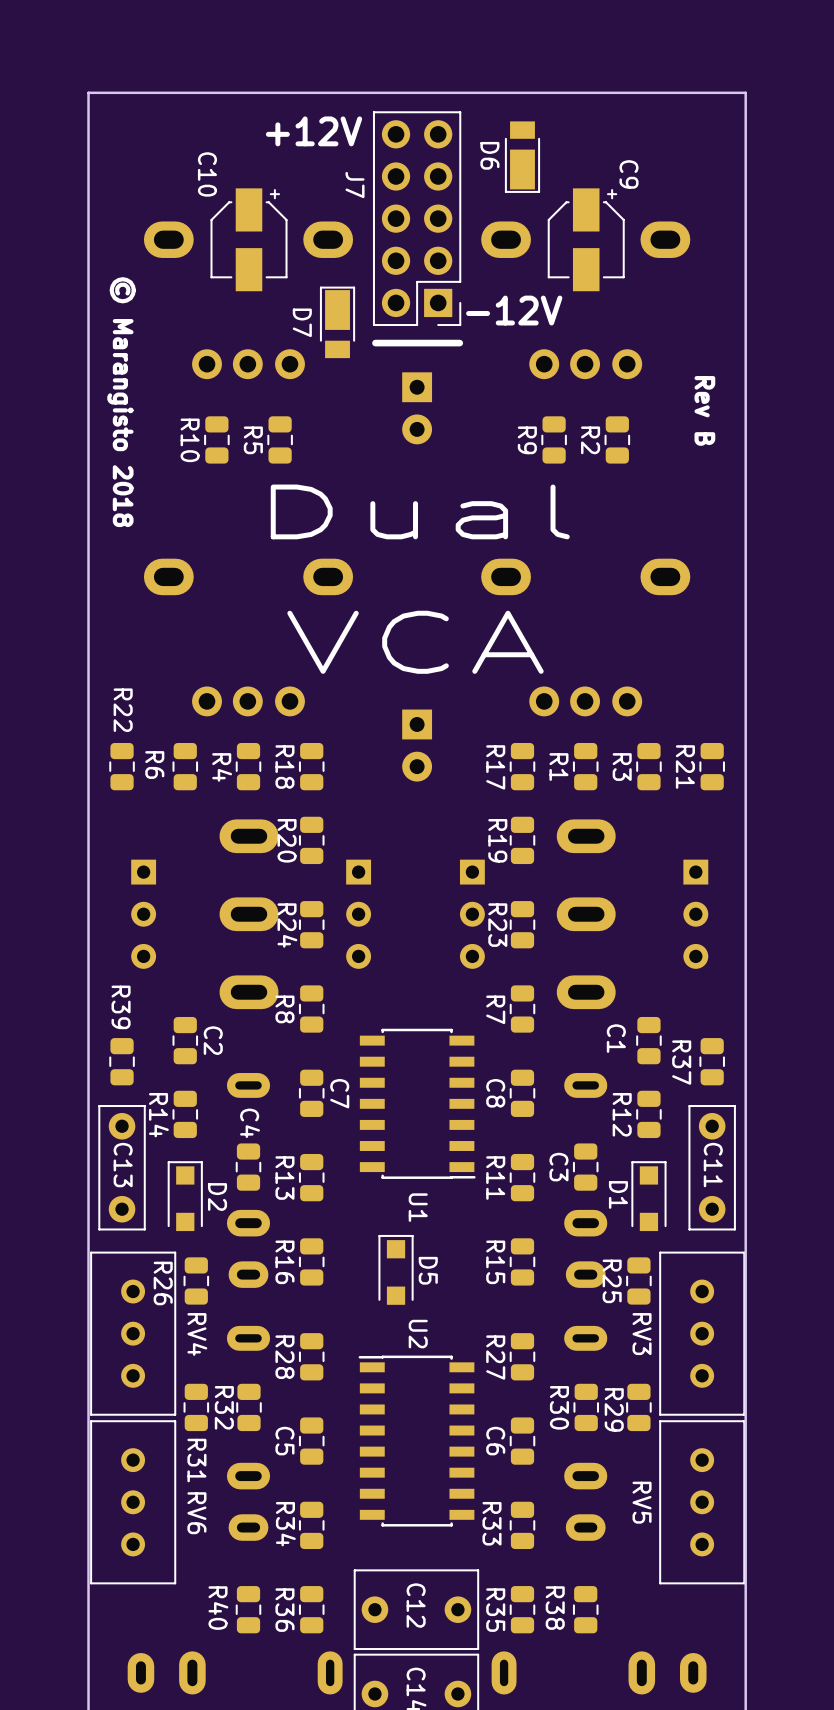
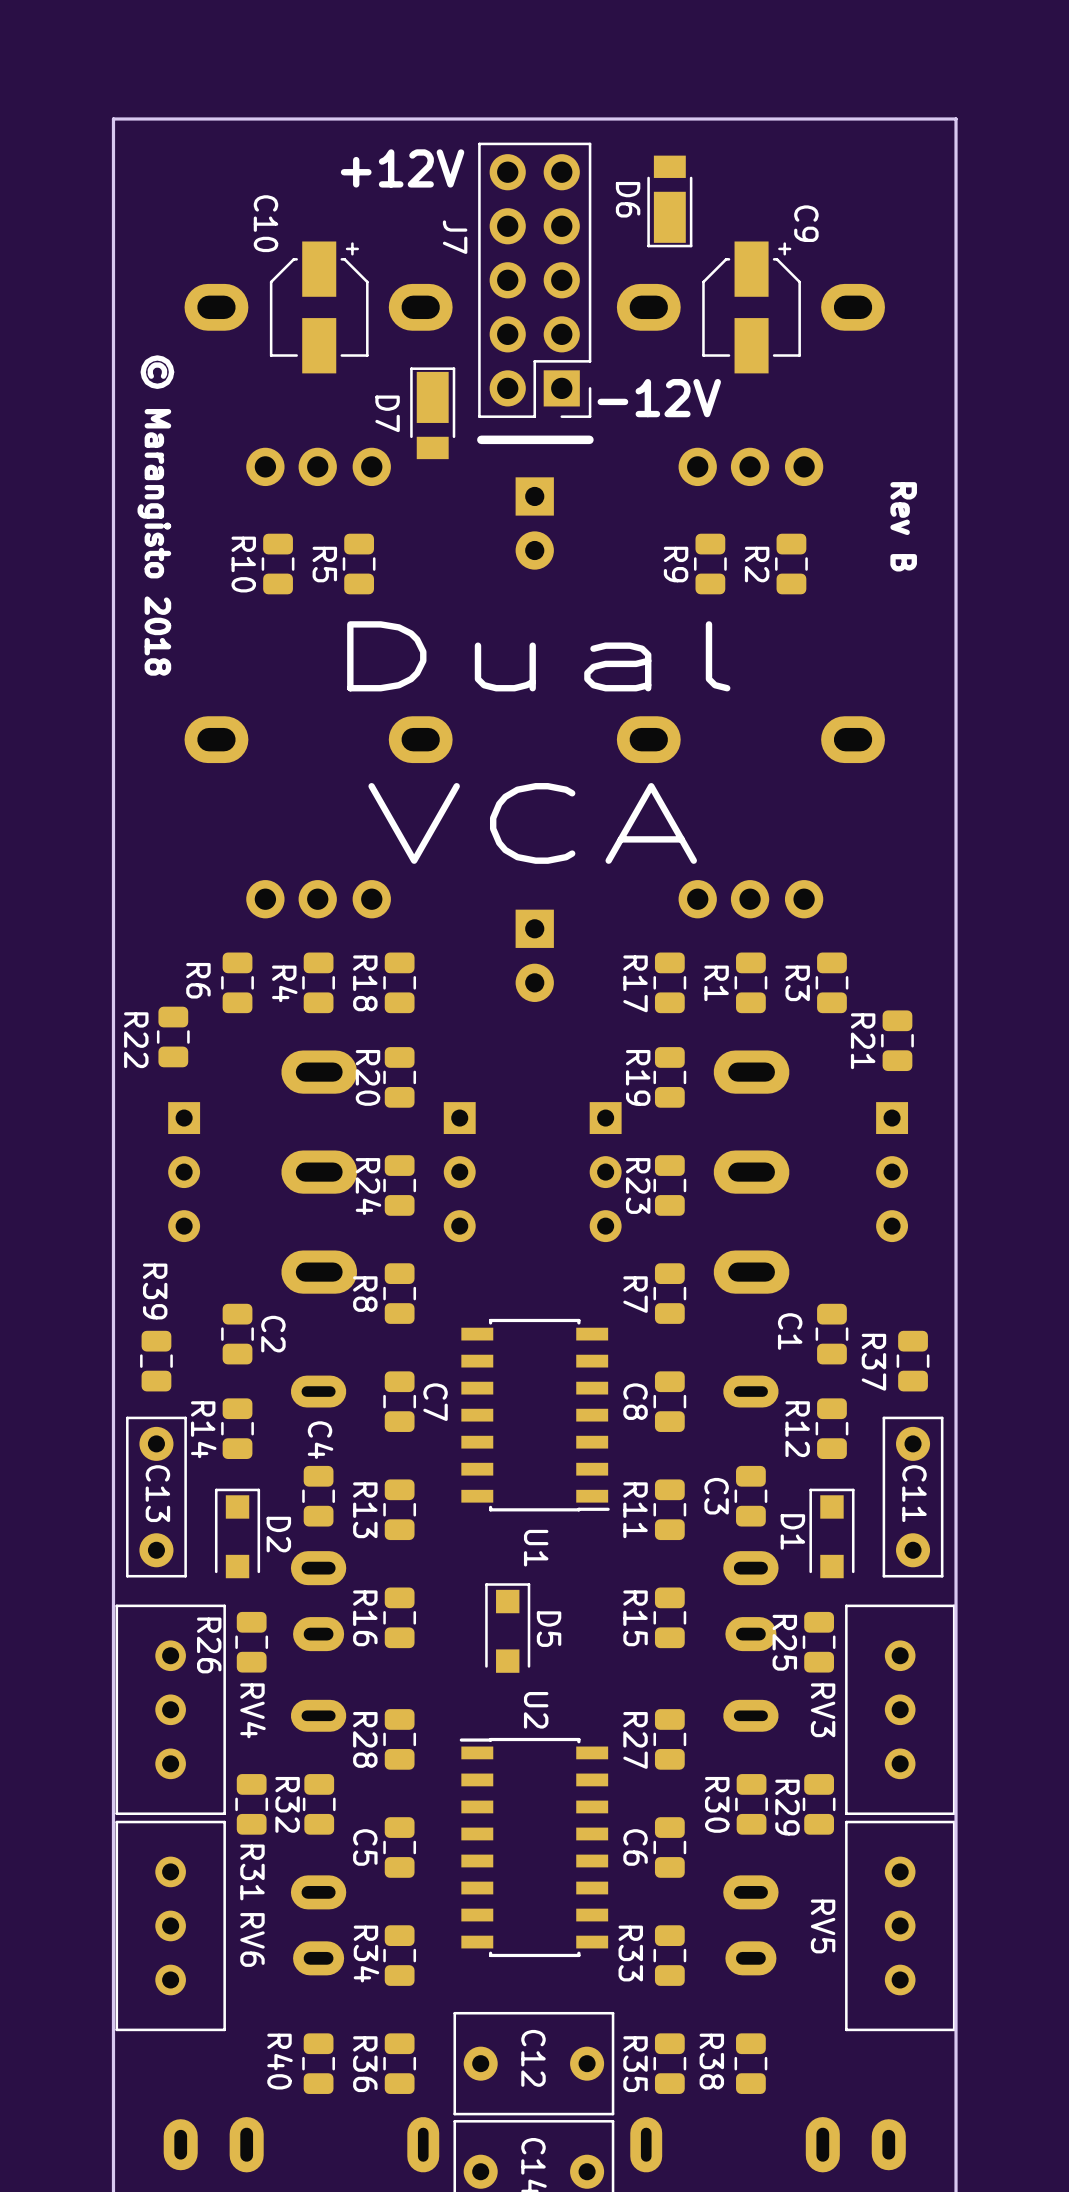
R22 name position: R22 (123, 710) -> R22 (136, 1040)
R22 position: (122, 766) -> (173, 1036)
R21 position: (712, 766) -> (897, 1040)

